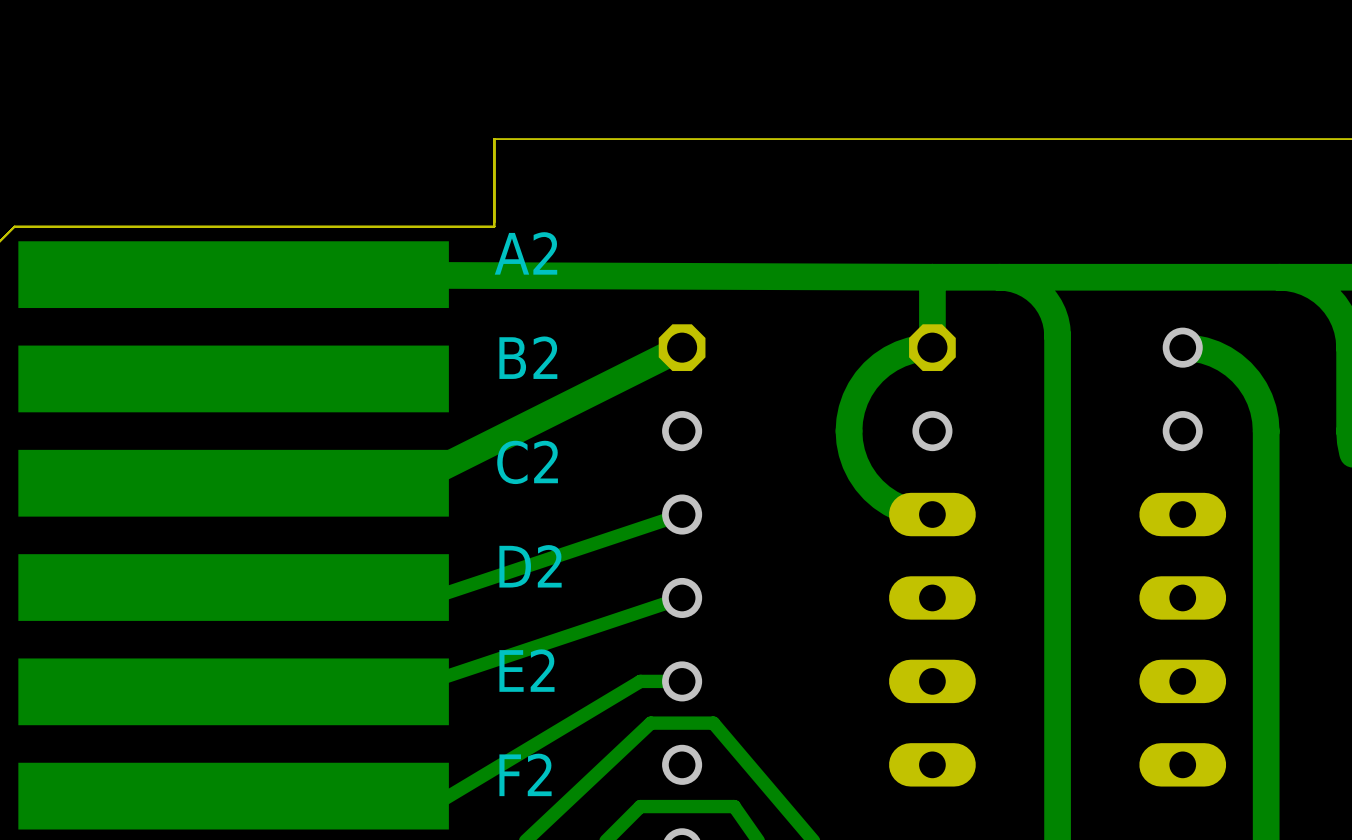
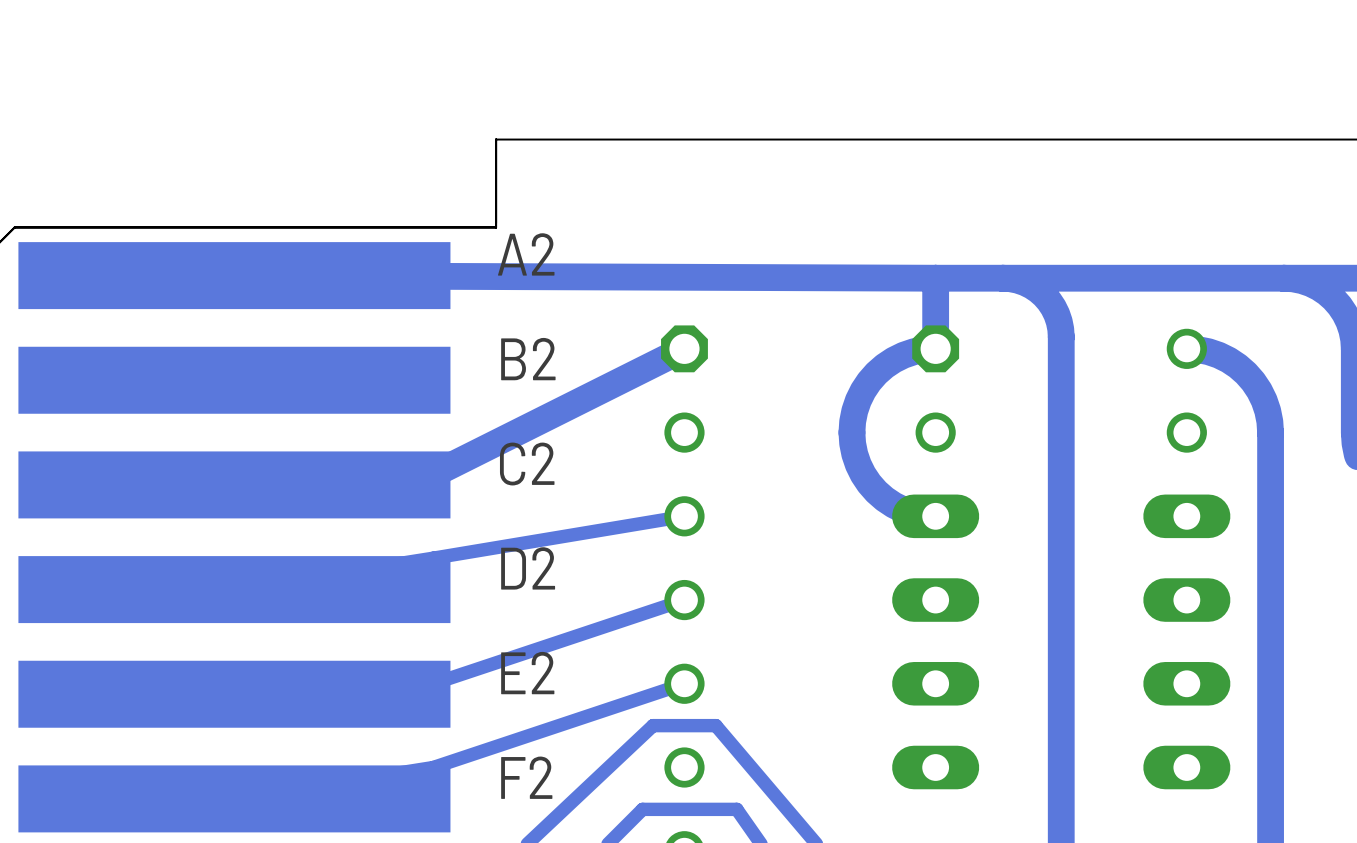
track: (682, 514) (431, 597) (233, 587) -> (684, 516) (234, 589)
track: (682, 681) (640, 681) (431, 806) (233, 796) -> (684, 683) (433, 767) (234, 798)

